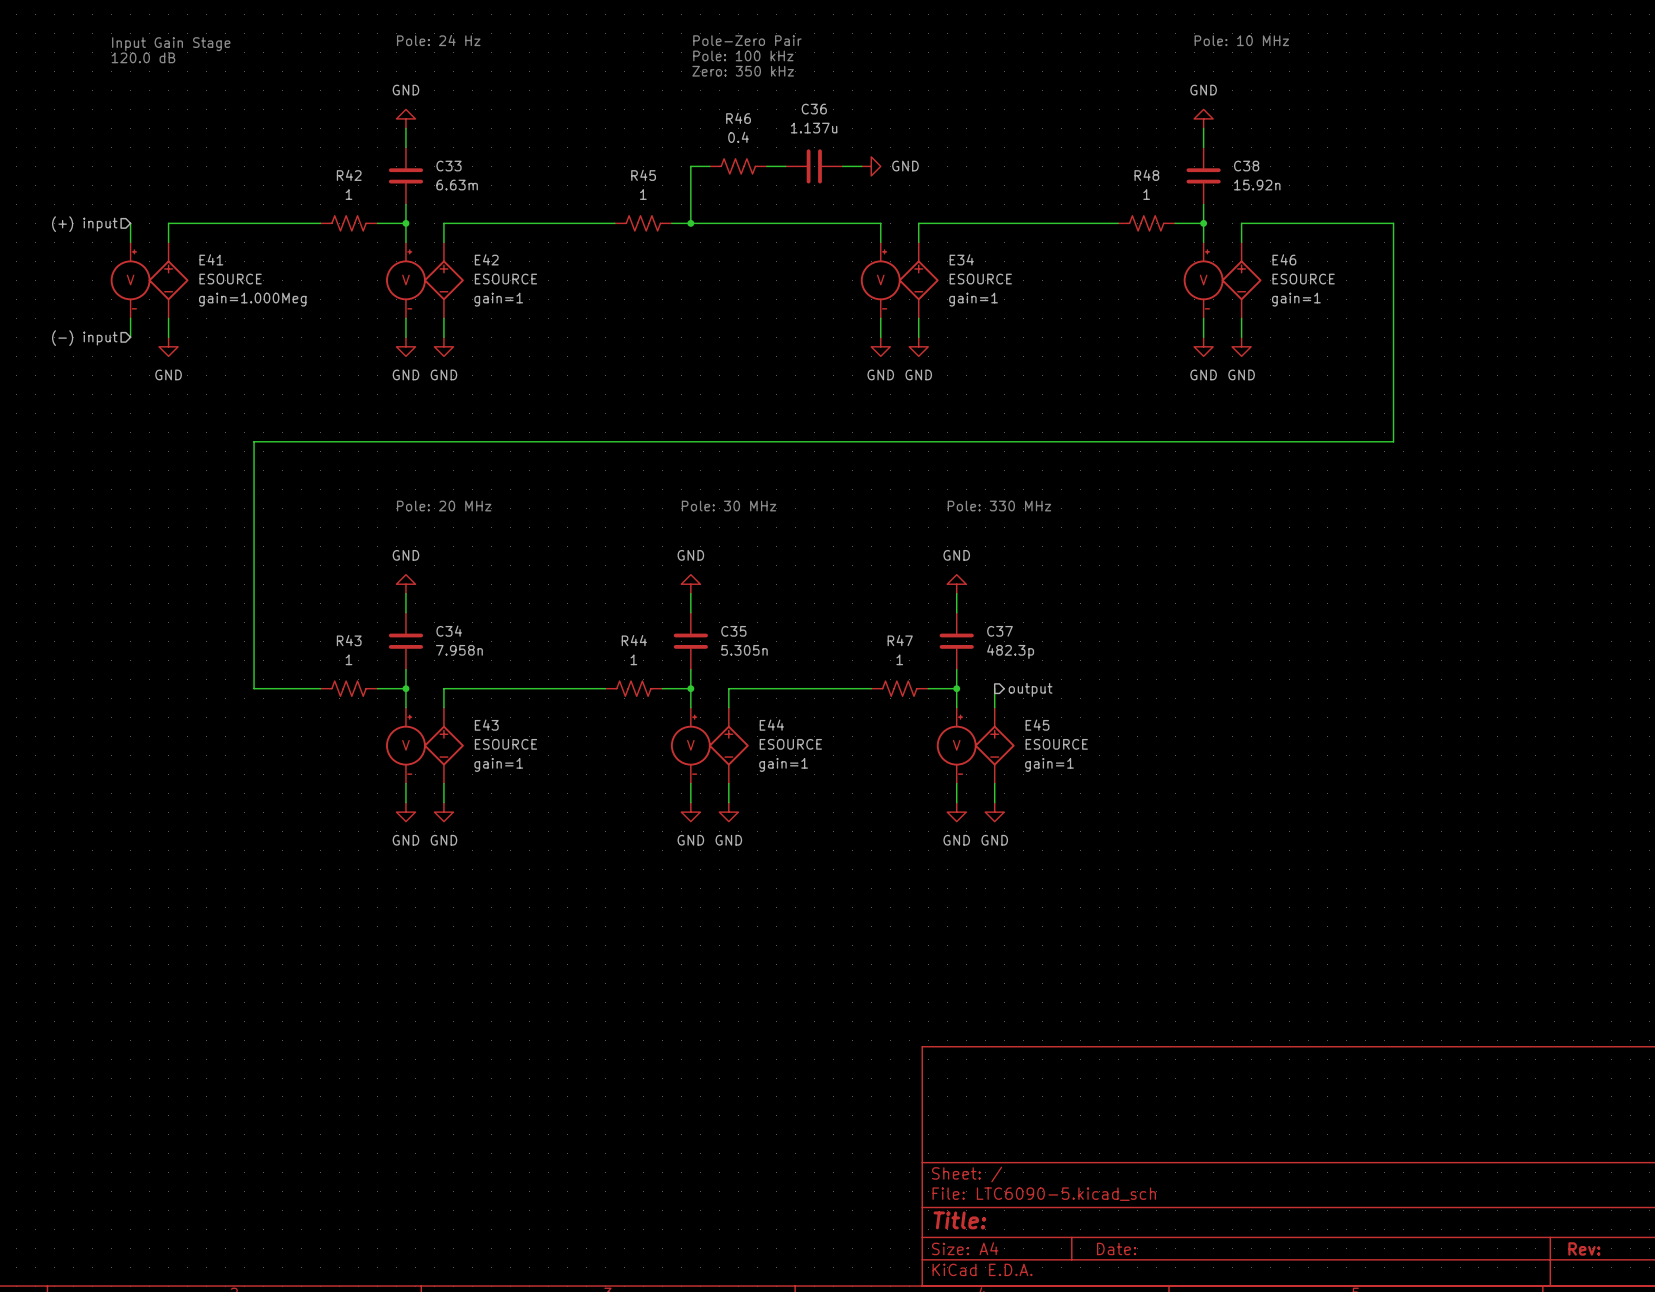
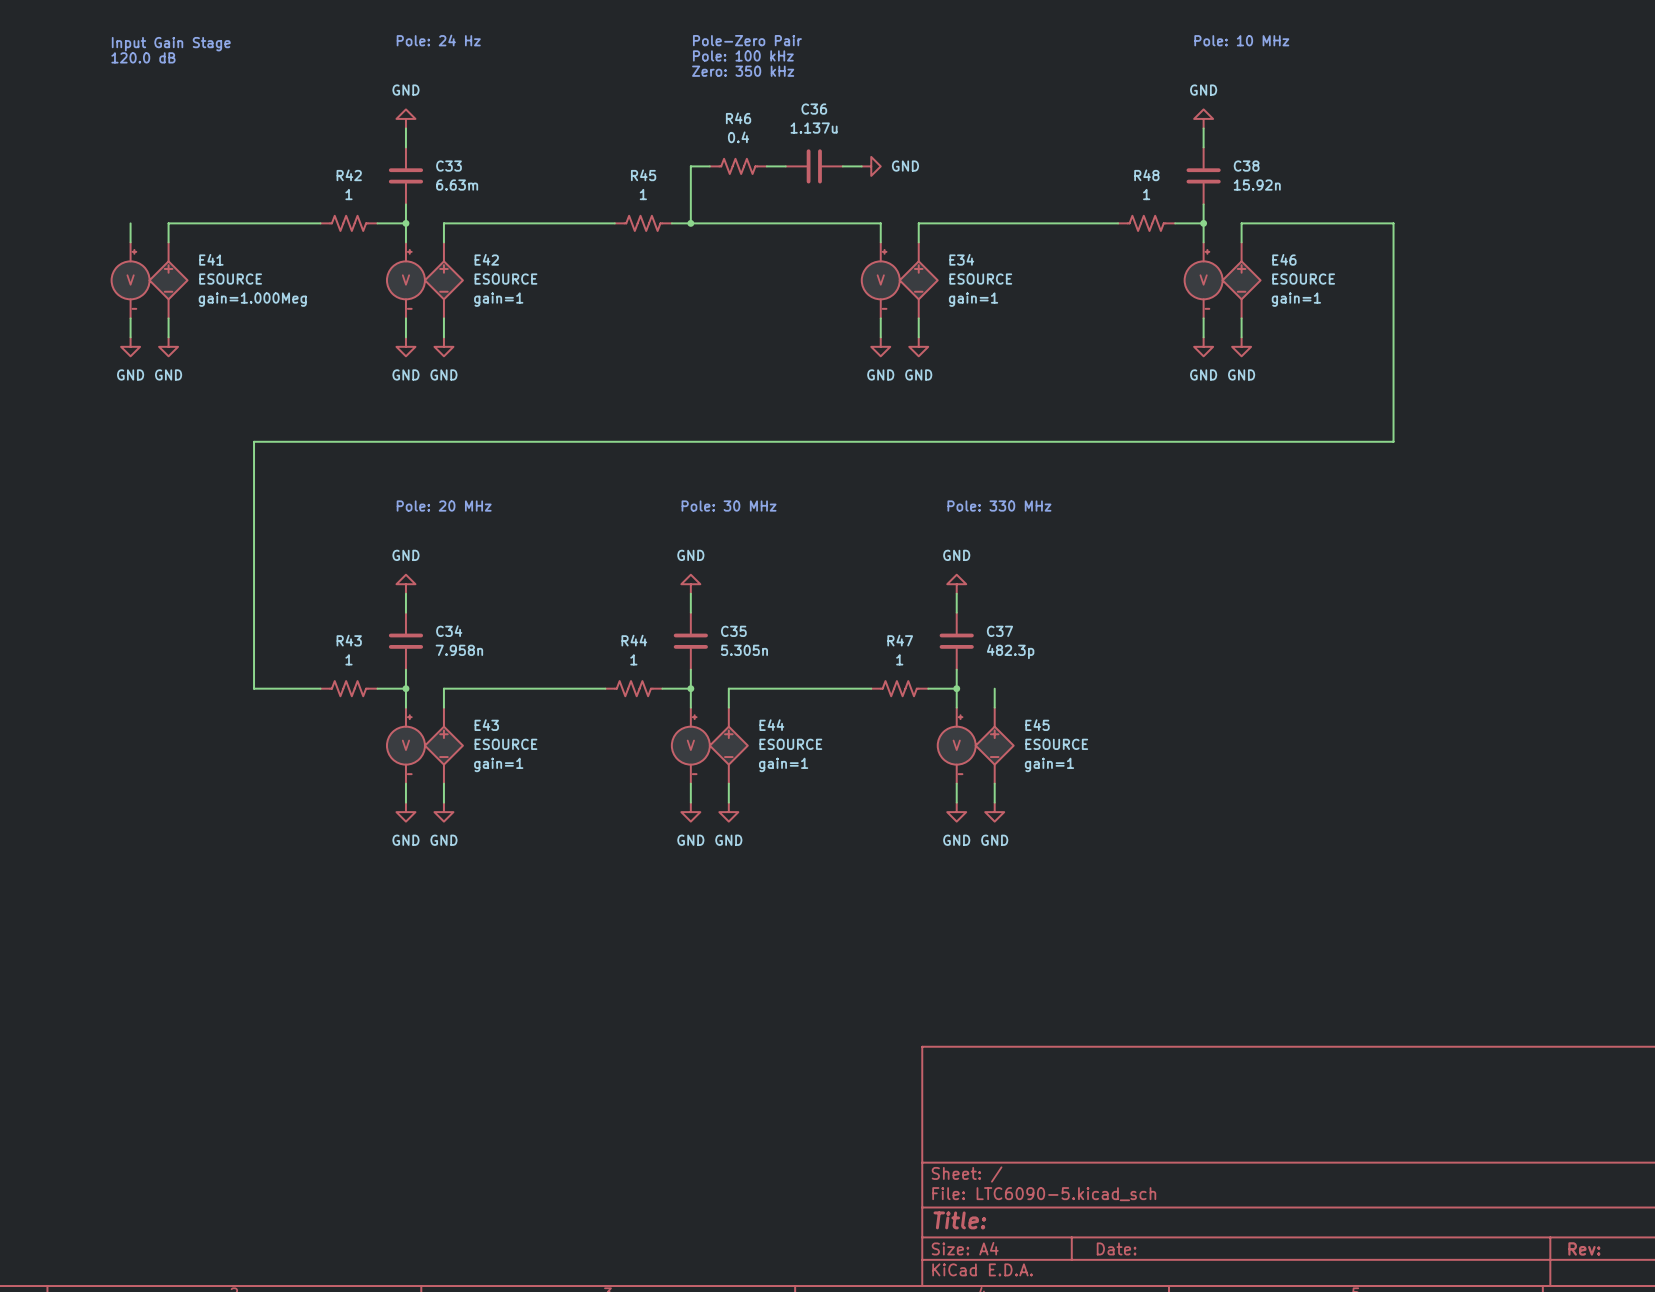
hierarchical label: (+) input (84, 224) -> none
hierarchical label: (-) input (84, 338) -> none
power symbol: none -> GND (130, 346)
hierarchical label: output (1030, 689) -> none

